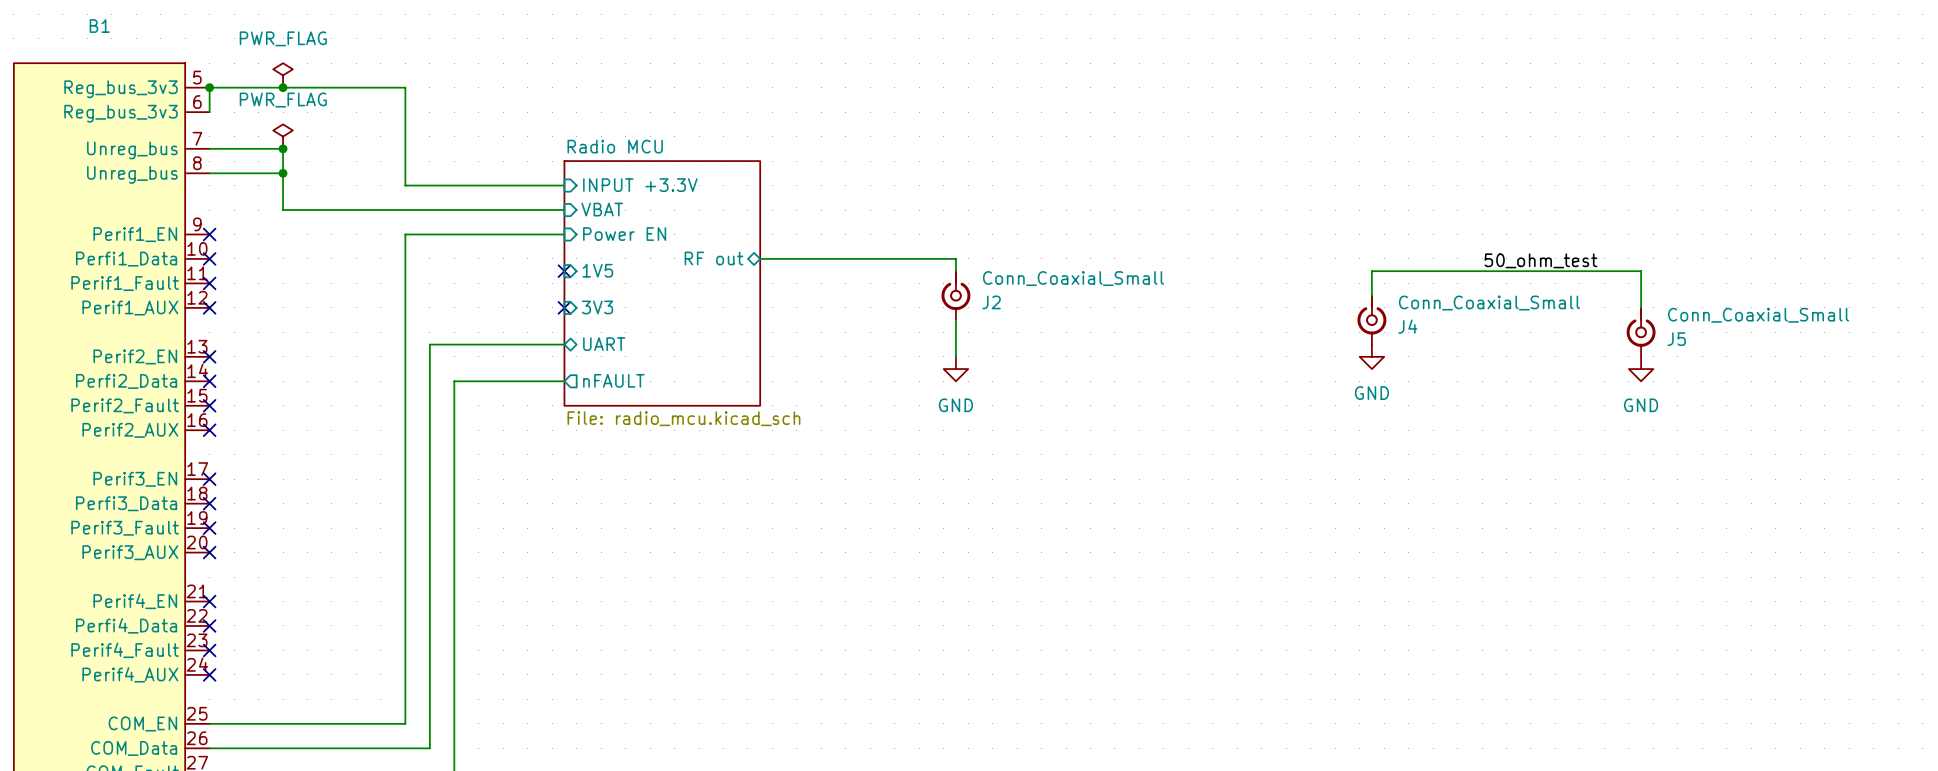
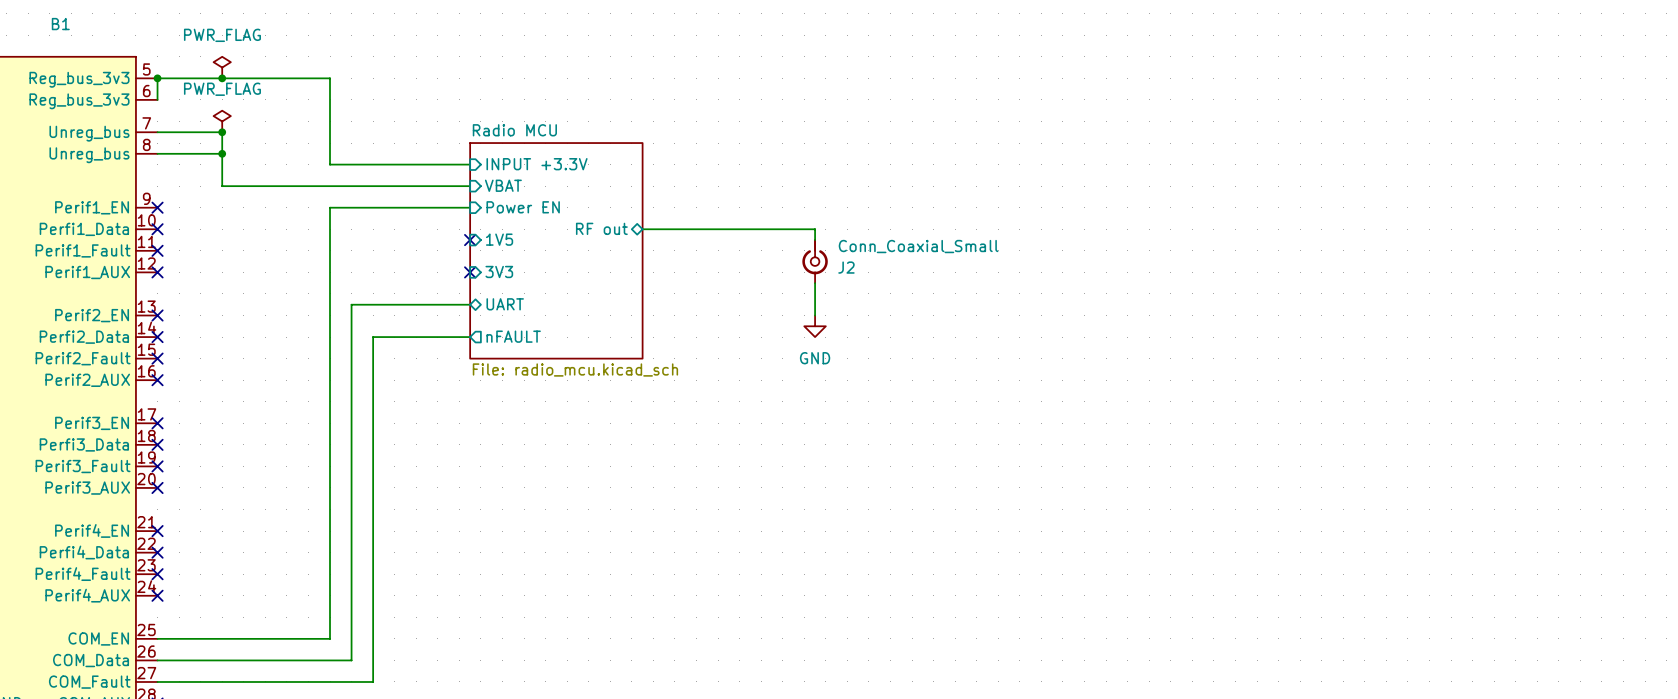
label: 50_ohm_test (1540, 260) -> none
wire: (1371, 295) (1371, 271) (1641, 271) (1641, 307) -> none
J4: Conn_Coaxial_Small (1371, 320) -> none
J5: Conn_Coaxial_Small (1641, 332) -> none
power symbol: GND (1371, 356) -> none
power symbol: GND (1641, 369) -> none

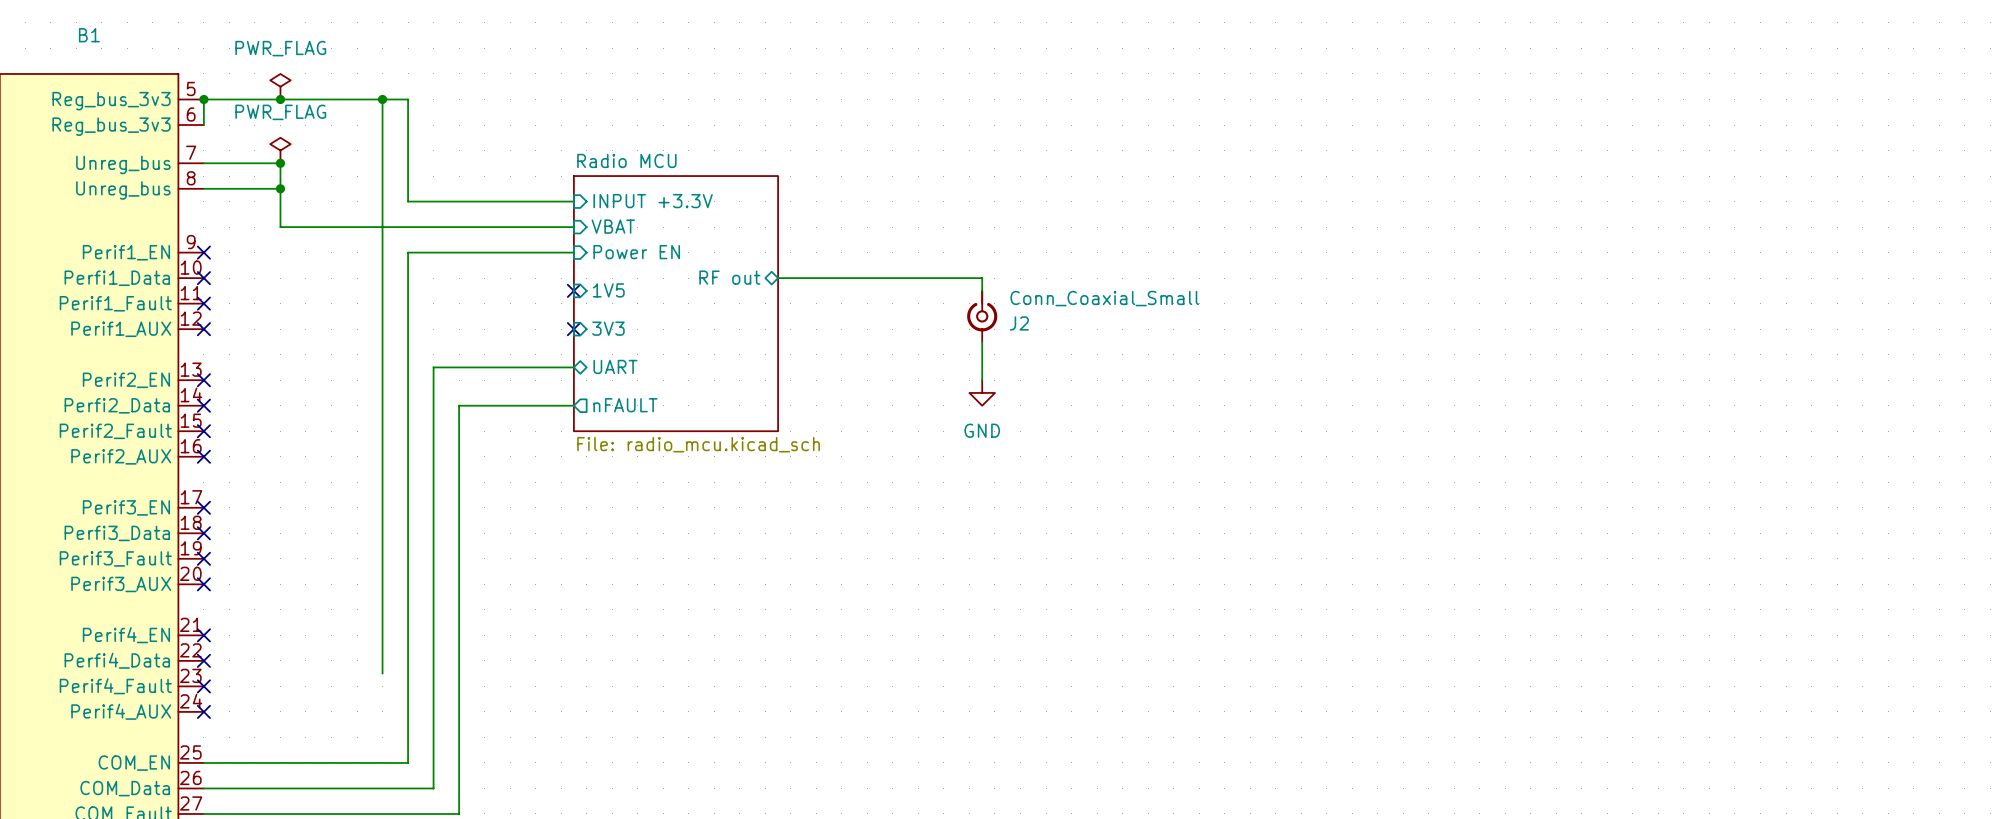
wire: none -> (382, 99) (382, 673)
junction: none -> (382, 99)

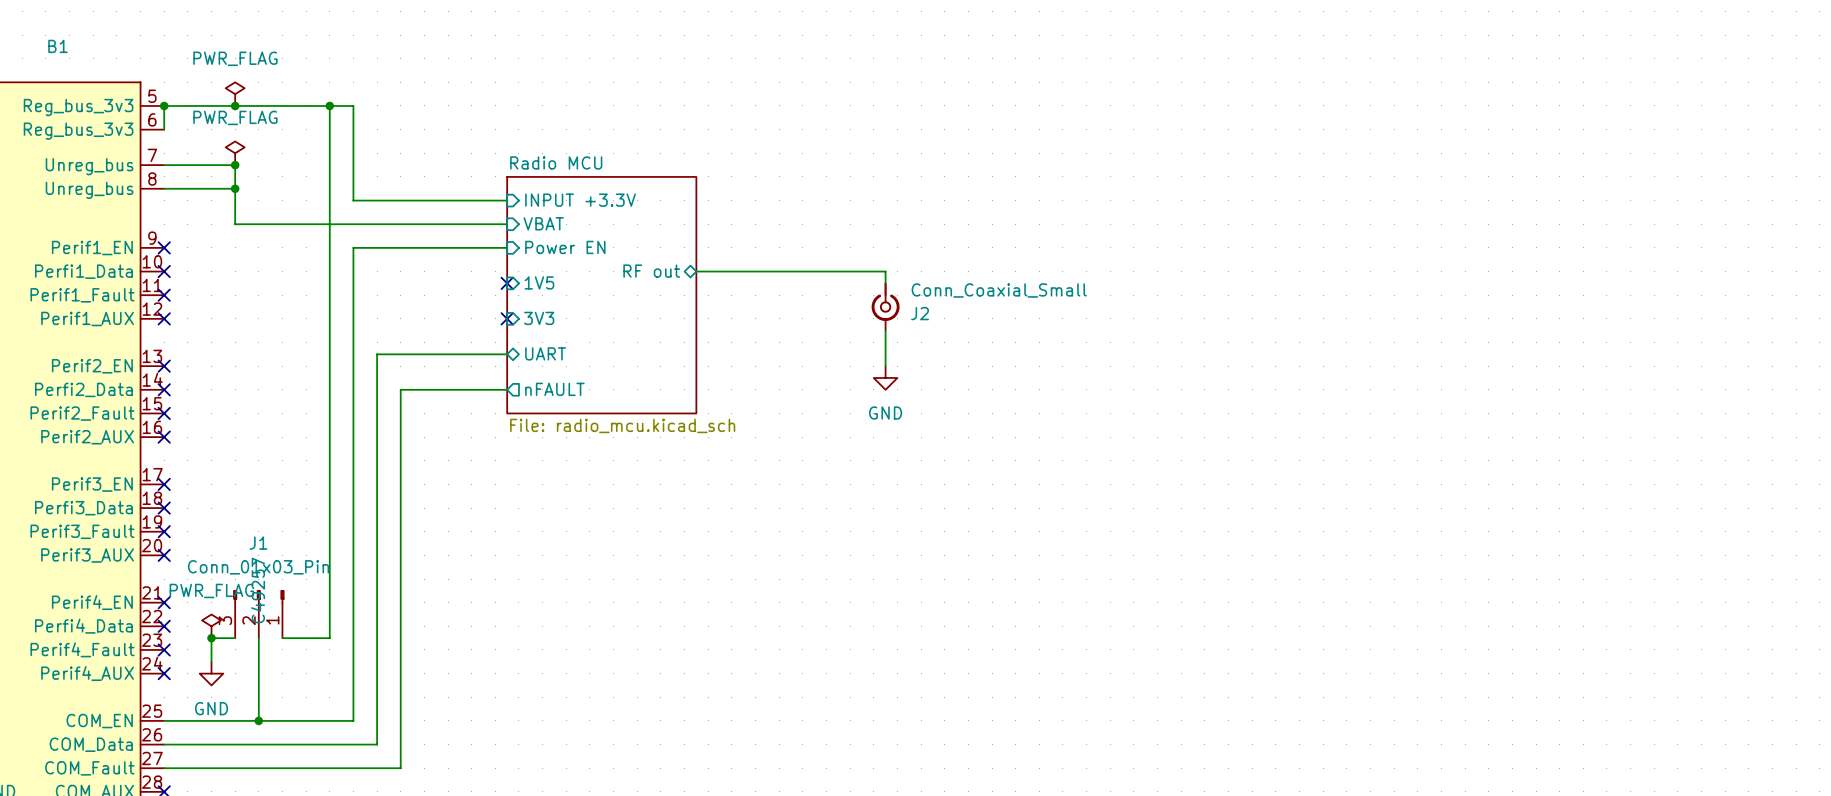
J1: none -> Conn_01x03_Pin (258, 614)
power symbol: none -> PWR_FLAG (211, 626)
junction: none -> (211, 638)
wire: none -> (235, 638) (211, 638) (211, 661)
wire: none -> (258, 638) (258, 720)
wire: none -> (282, 638) (329, 638)
power symbol: none -> GND (211, 673)
junction: none -> (258, 720)

